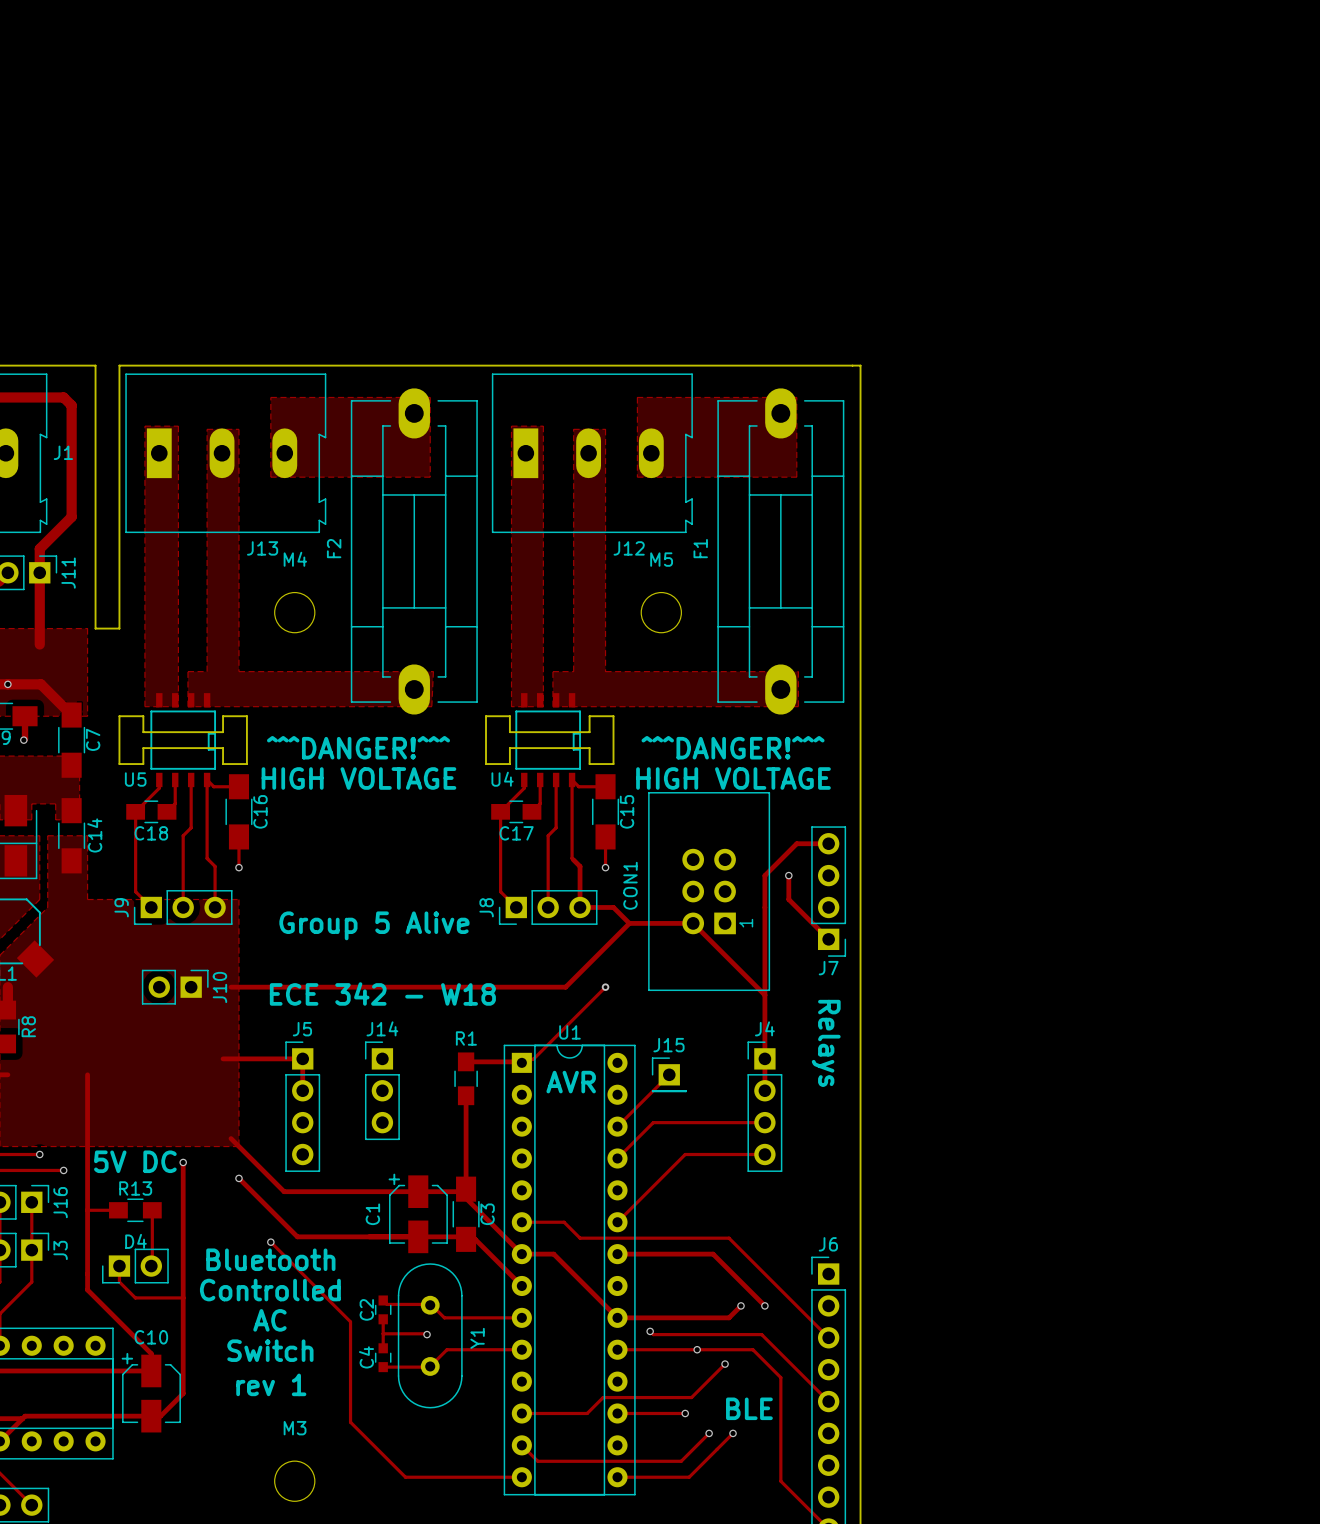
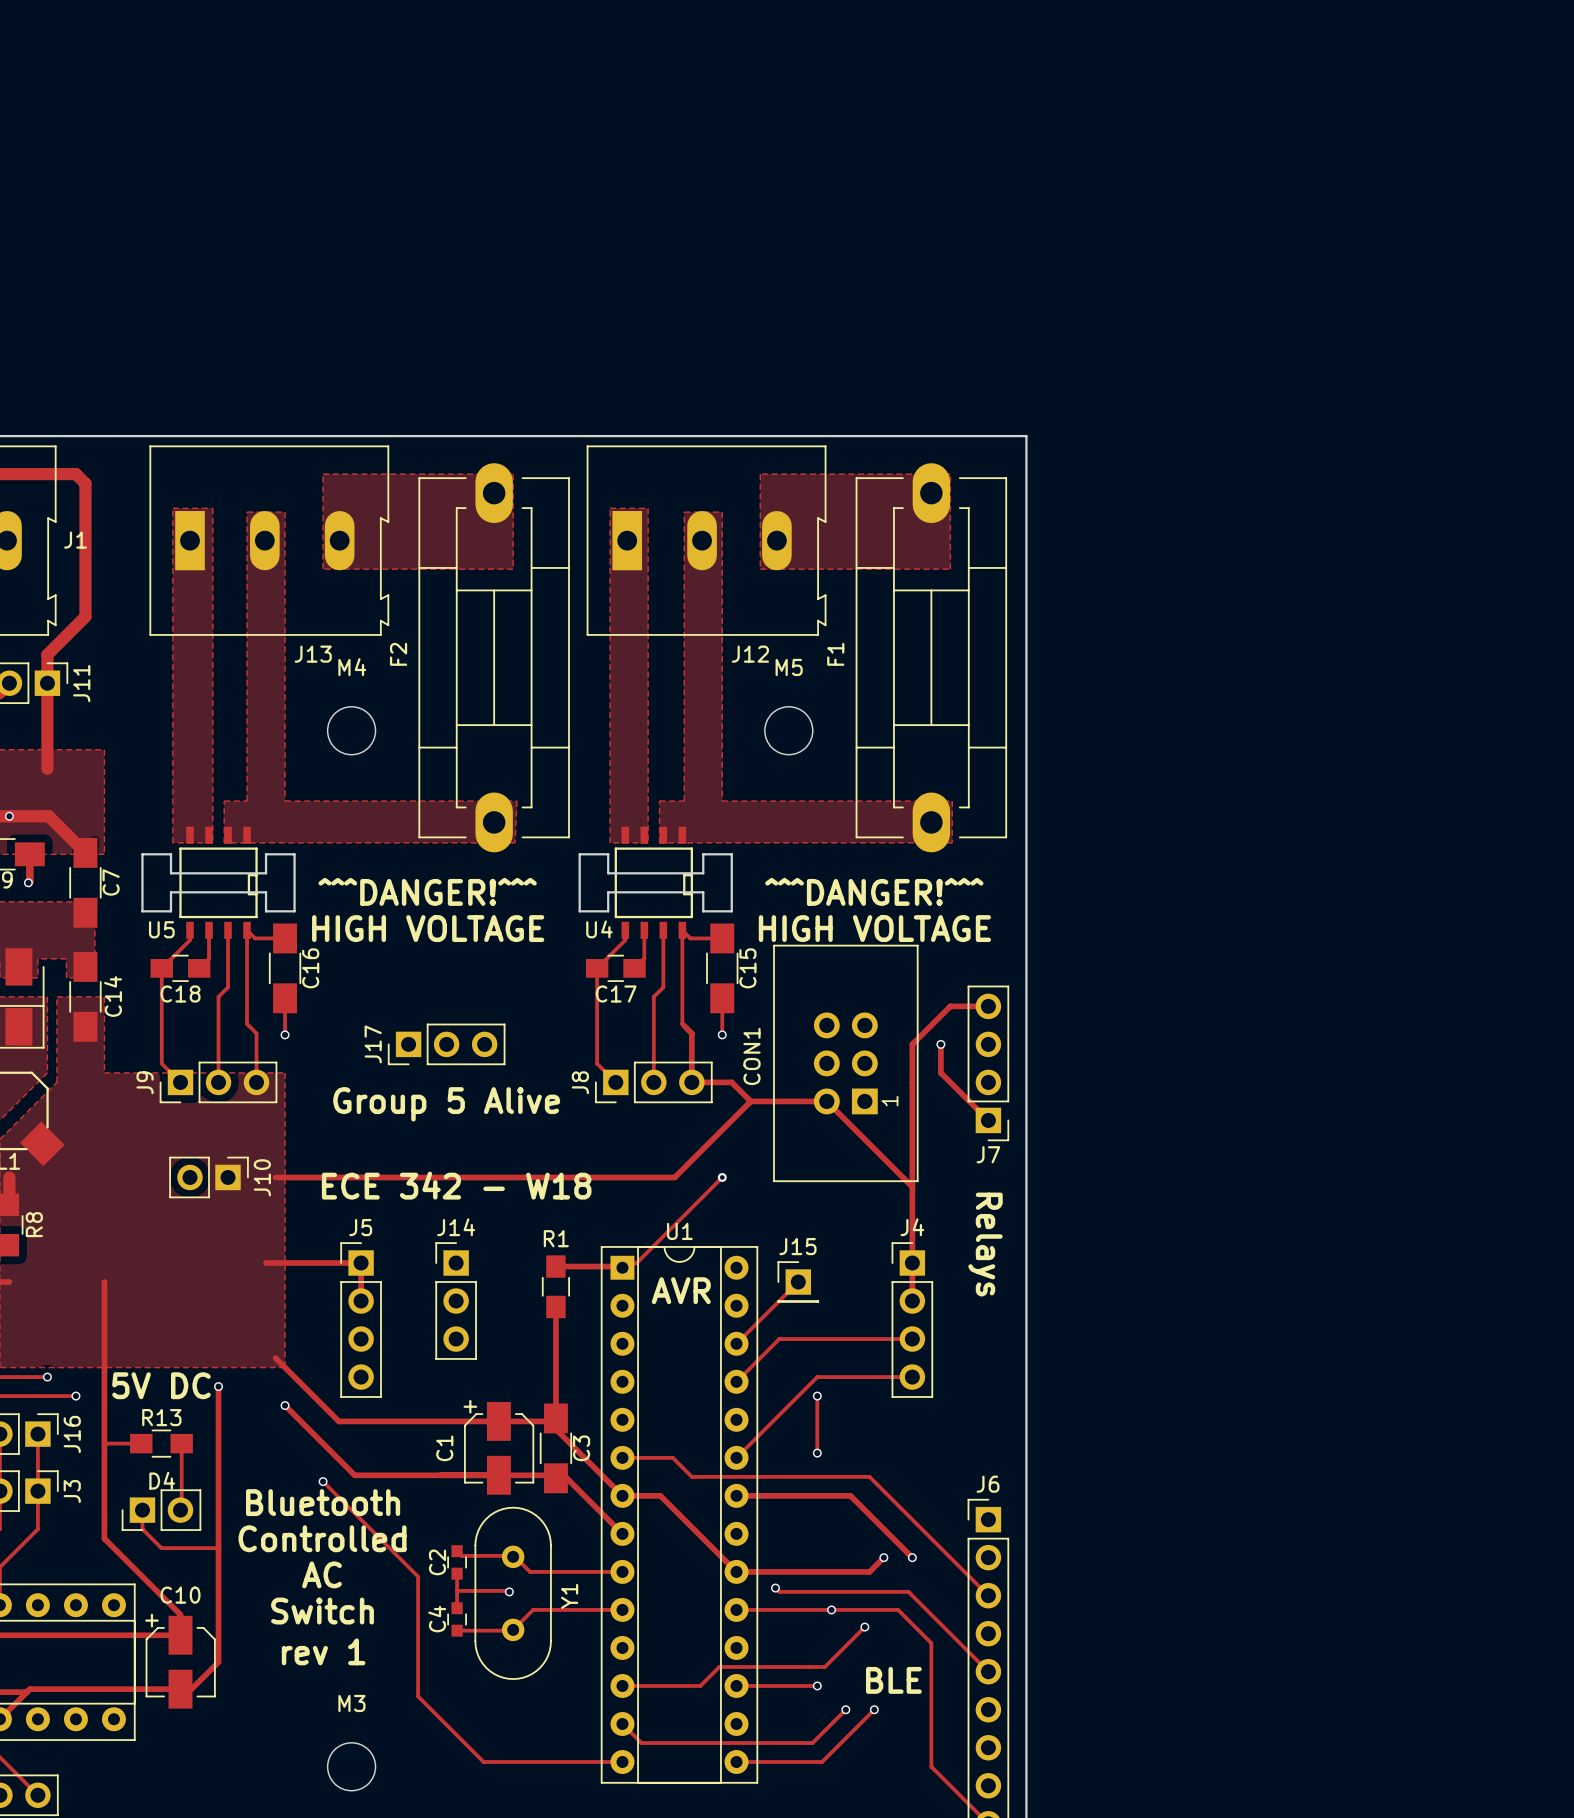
board edge: (95, 365) (95, 628) (119, 628) (119, 365) -> (113, 436) (142, 436)
J17: none -> (446, 1044)
track: none -> (817, 1396) (817, 1453)
via: none -> (817, 1396)
via: none -> (817, 1453)

